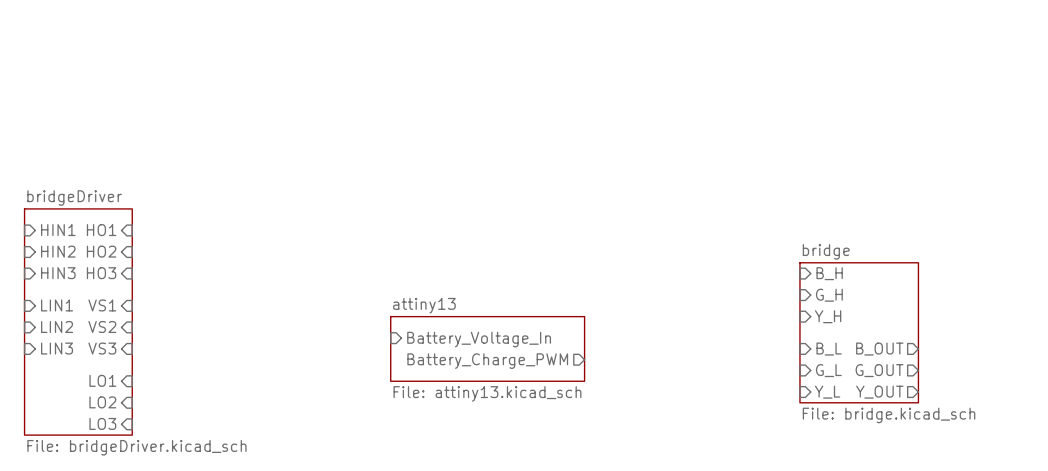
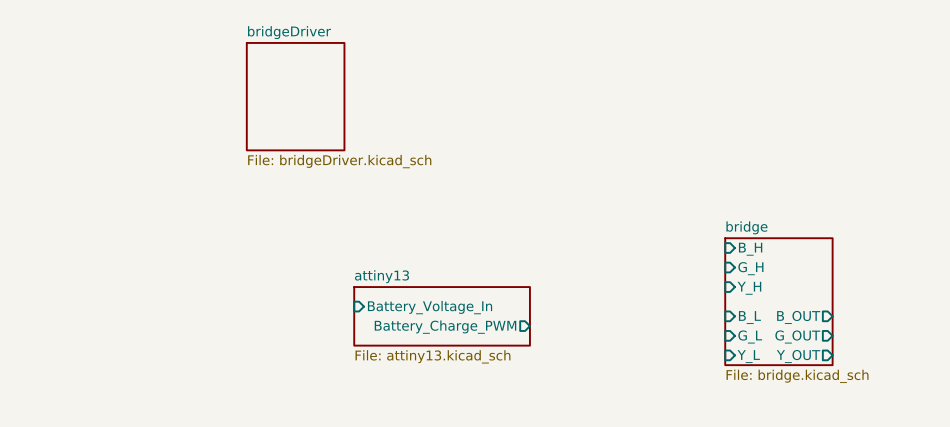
sheet bridgeDriver: none -> File: bridgeDriver.kicad_sch (295, 96)
sheet pin: HIN1 (58, 230) -> none
sheet pin: HO1 (101, 230) -> none
sheet pin: HIN2 (58, 251) -> none
sheet pin: HO2 (101, 251) -> none
sheet pin: HIN3 (58, 273) -> none
sheet pin: HO3 (101, 273) -> none
sheet pin: LIN1 (57, 305) -> none
sheet pin: VS1 (102, 305) -> none
sheet bridgeDriver: File: bridgeDriver.kicad_sch (78, 322) -> none
sheet pin: LIN2 (57, 327) -> none
sheet pin: VS2 (102, 327) -> none
sheet pin: LIN3 (57, 348) -> none
sheet pin: VS3 (102, 348) -> none
sheet pin: LO1 (102, 380) -> none
sheet pin: LO2 (102, 402) -> none
sheet pin: LO3 (102, 423) -> none

